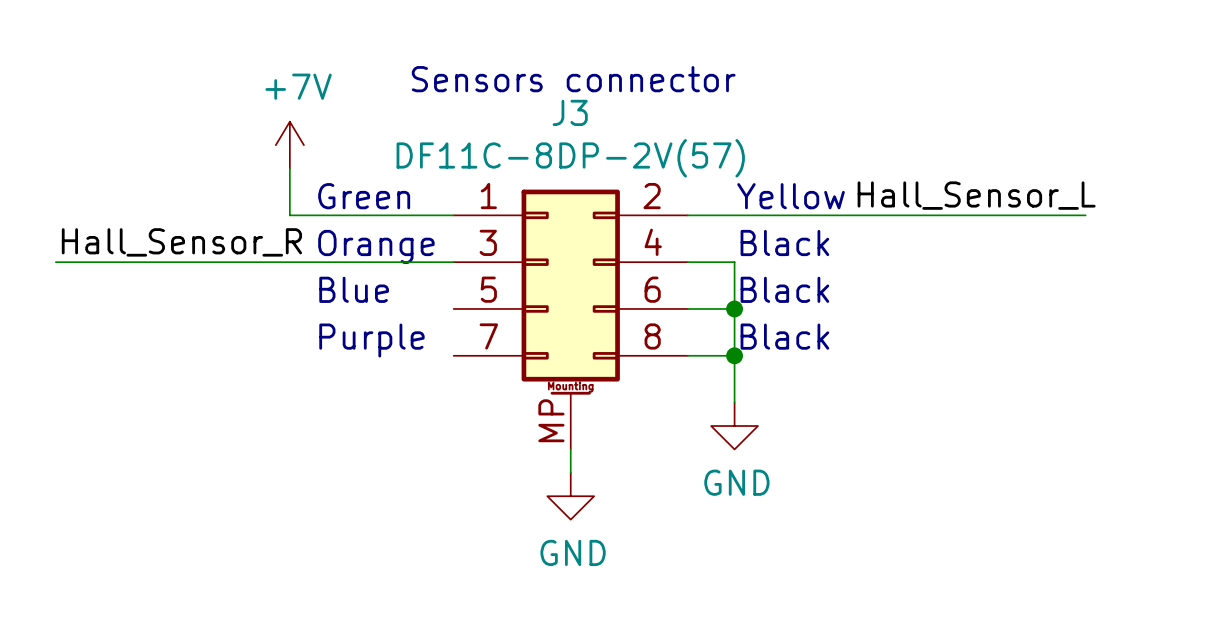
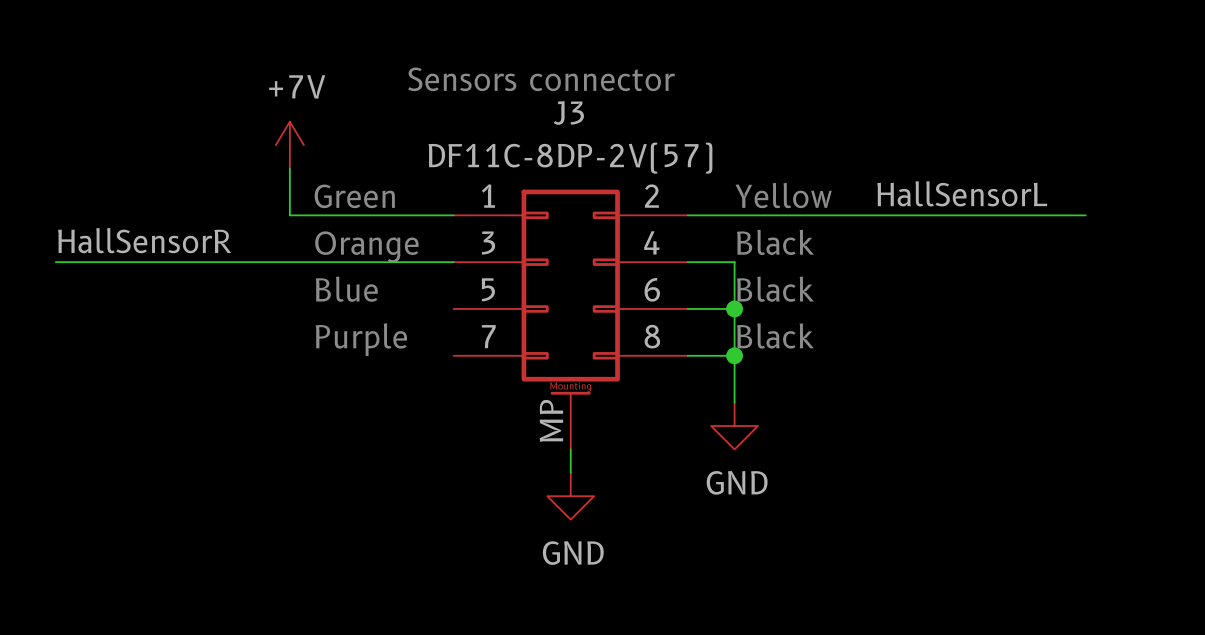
label: Hall_Sensor_L (976, 195) -> HallSensorL (962, 193)
label: Hall_Sensor_R (181, 242) -> HallSensorR (144, 240)

